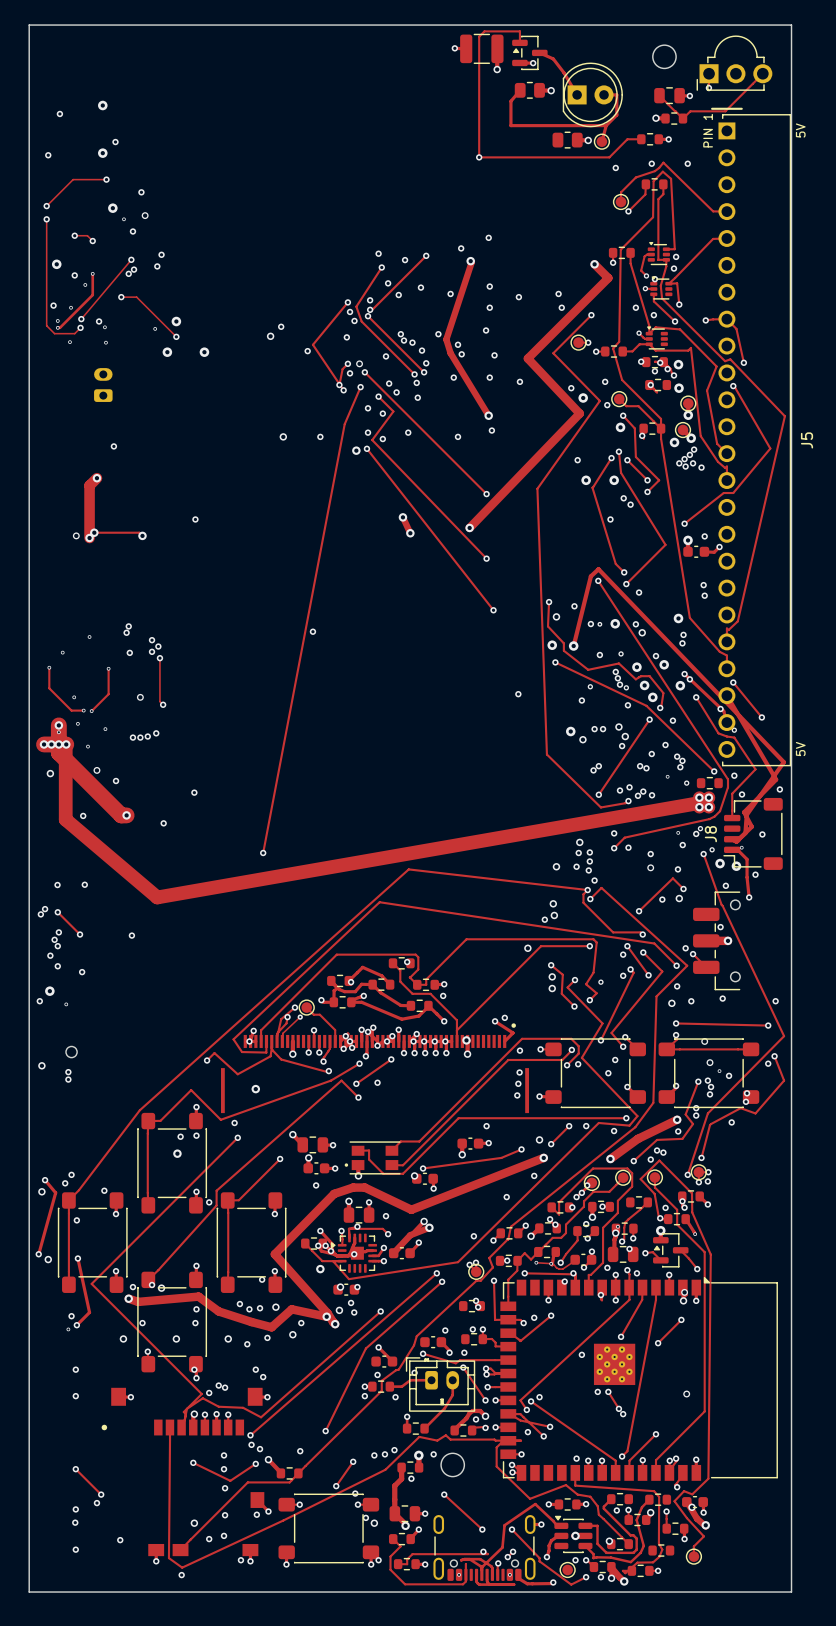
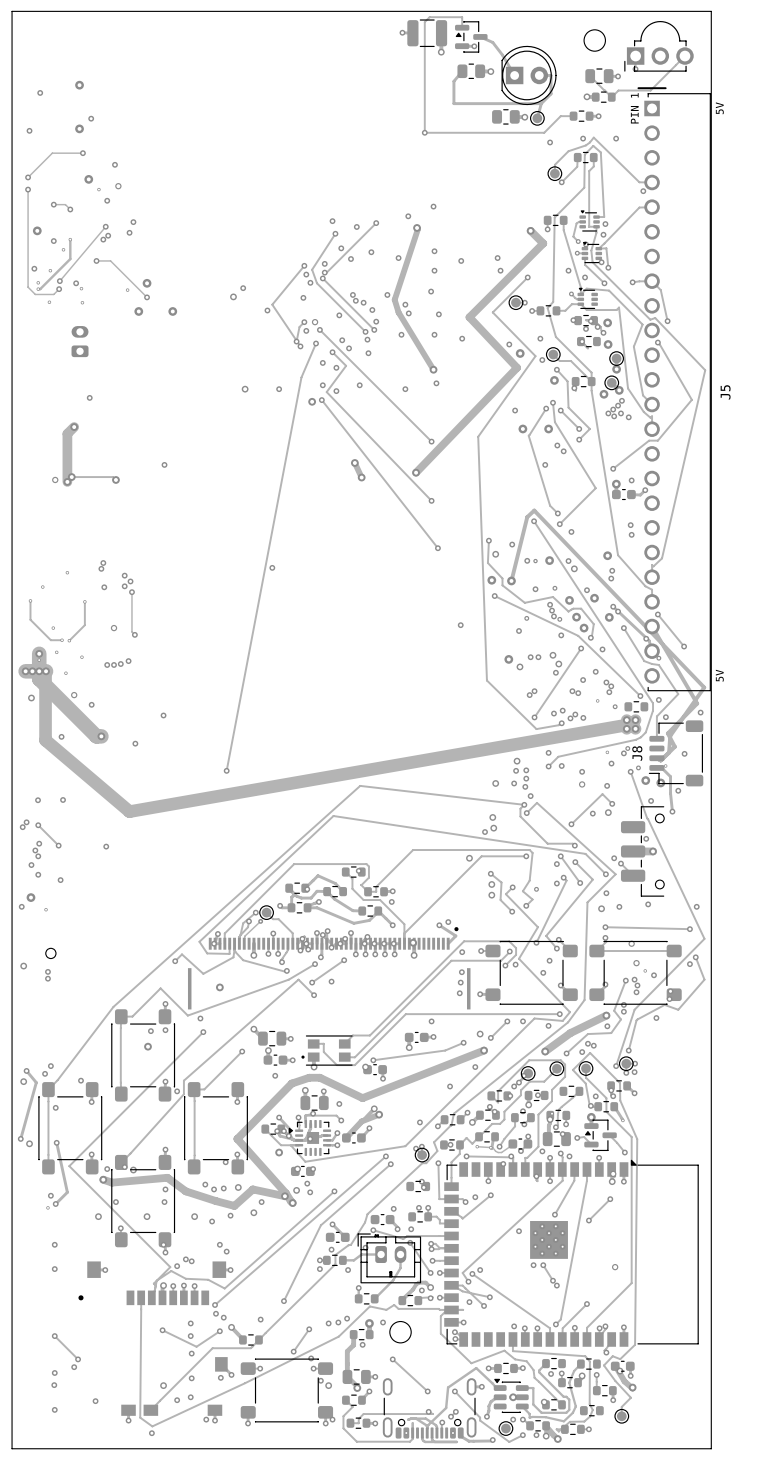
via: none -> (643, 191)
via: none -> (601, 262)

